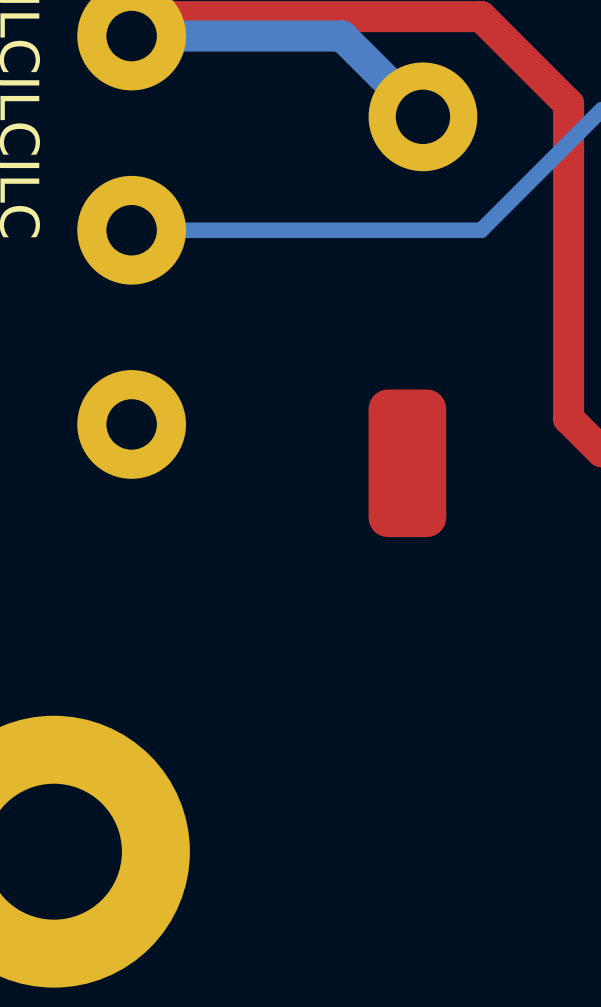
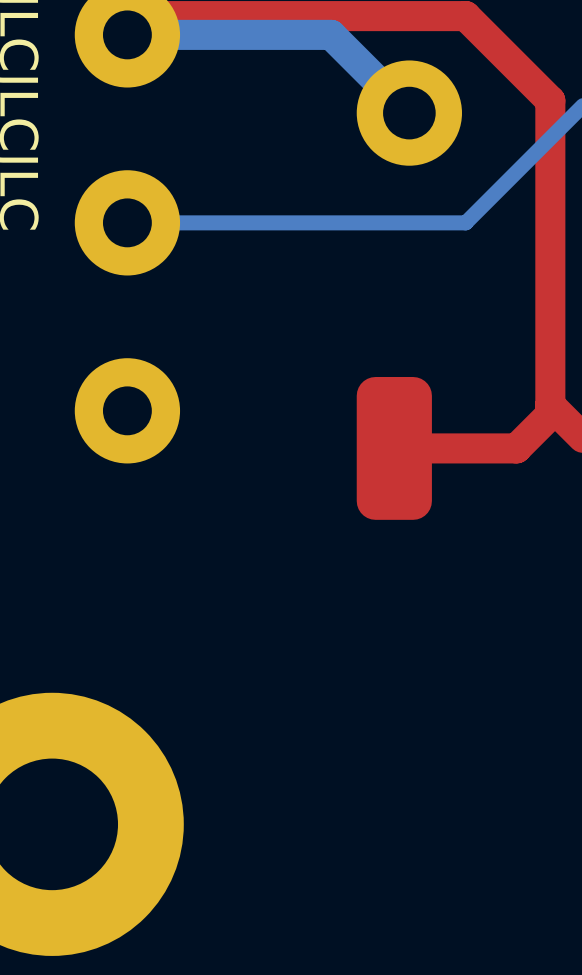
top track: none -> (550, 405) (550, 414) (516, 448) (394, 448)

